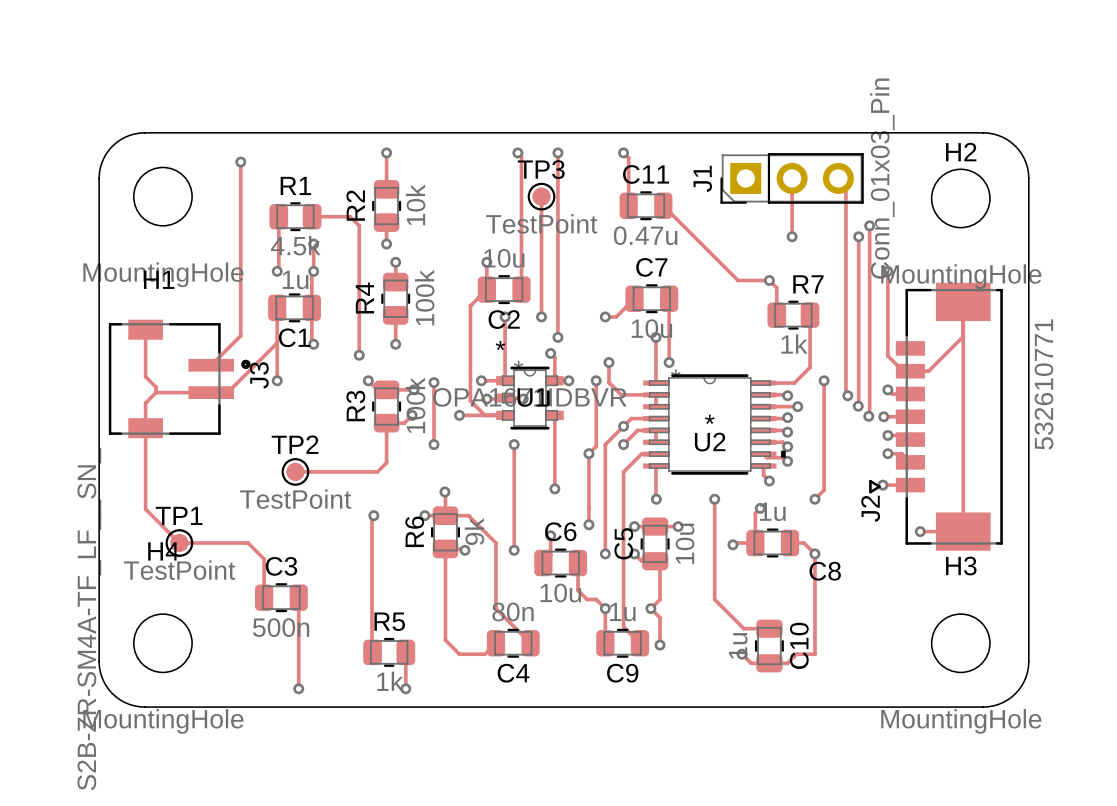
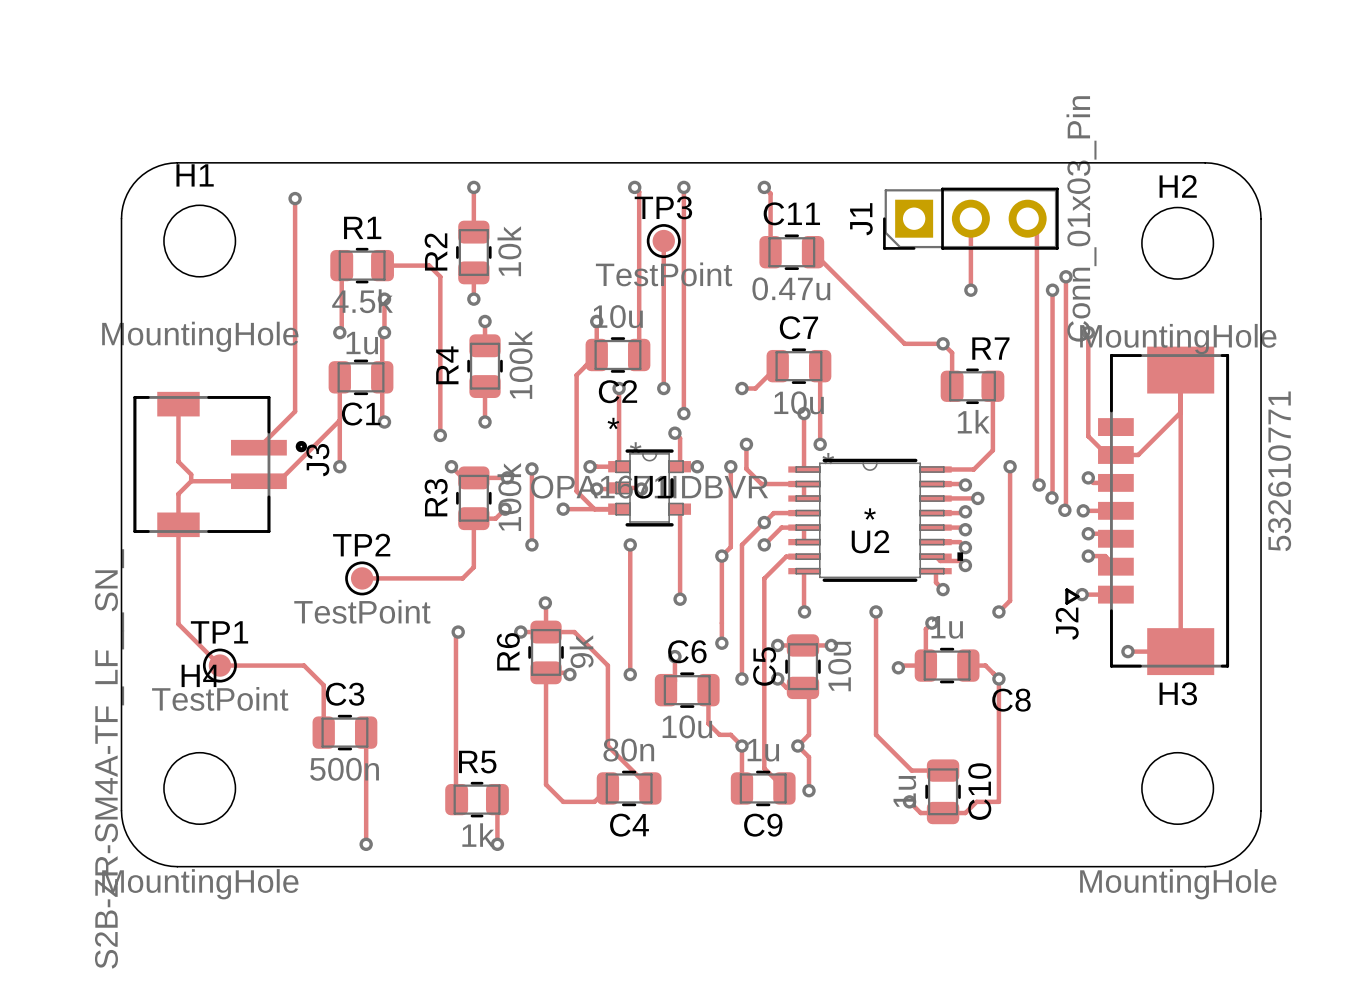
H1 name position: H1 (159, 279) -> H1 (195, 175)

